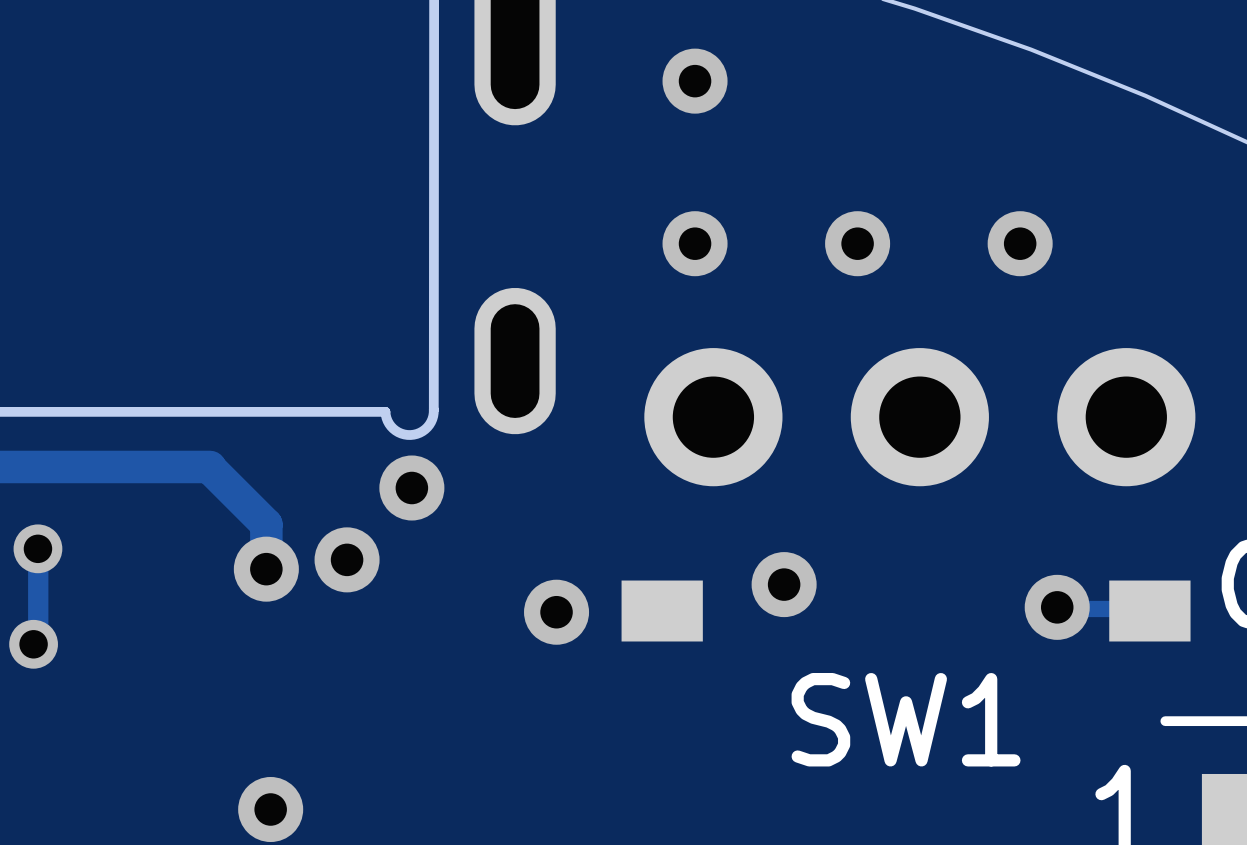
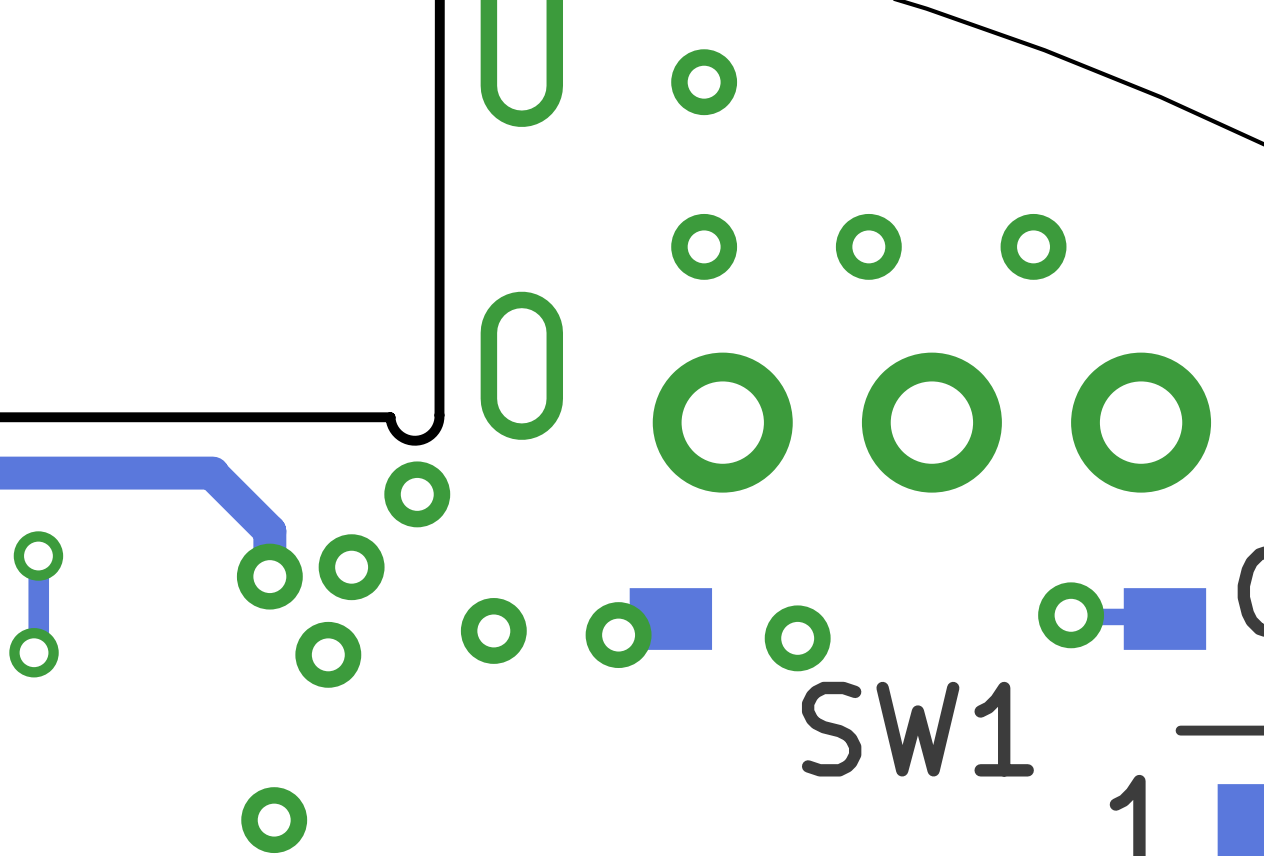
via position: (784, 584) -> (797, 638)
via position: (556, 612) -> (618, 635)
via: none -> (493, 630)
via: none -> (328, 654)

